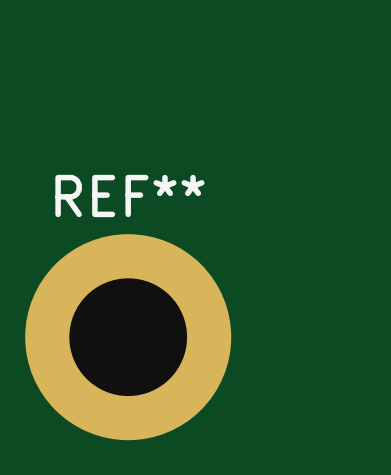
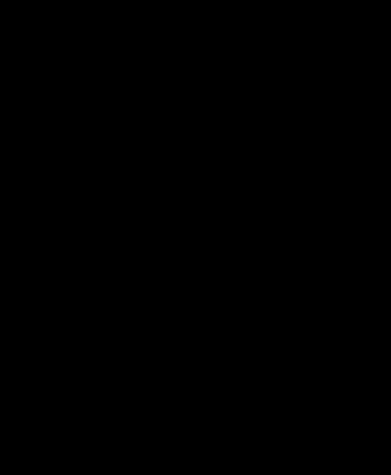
REF**: (128, 337) -> none

